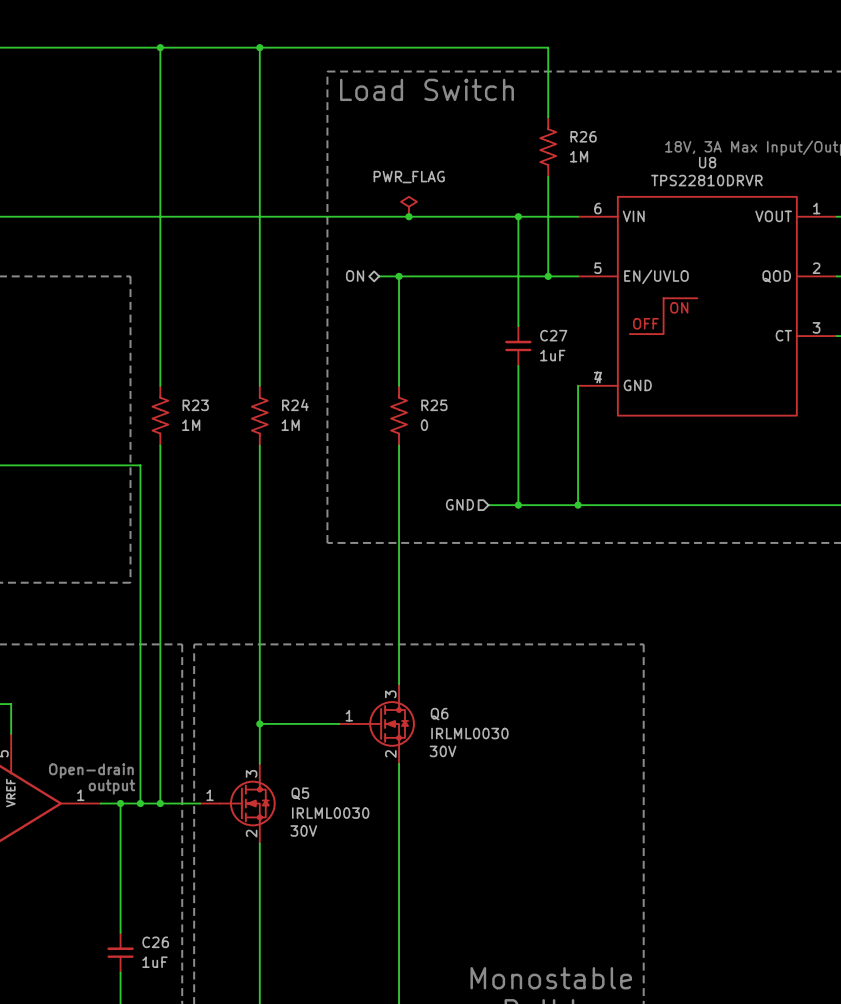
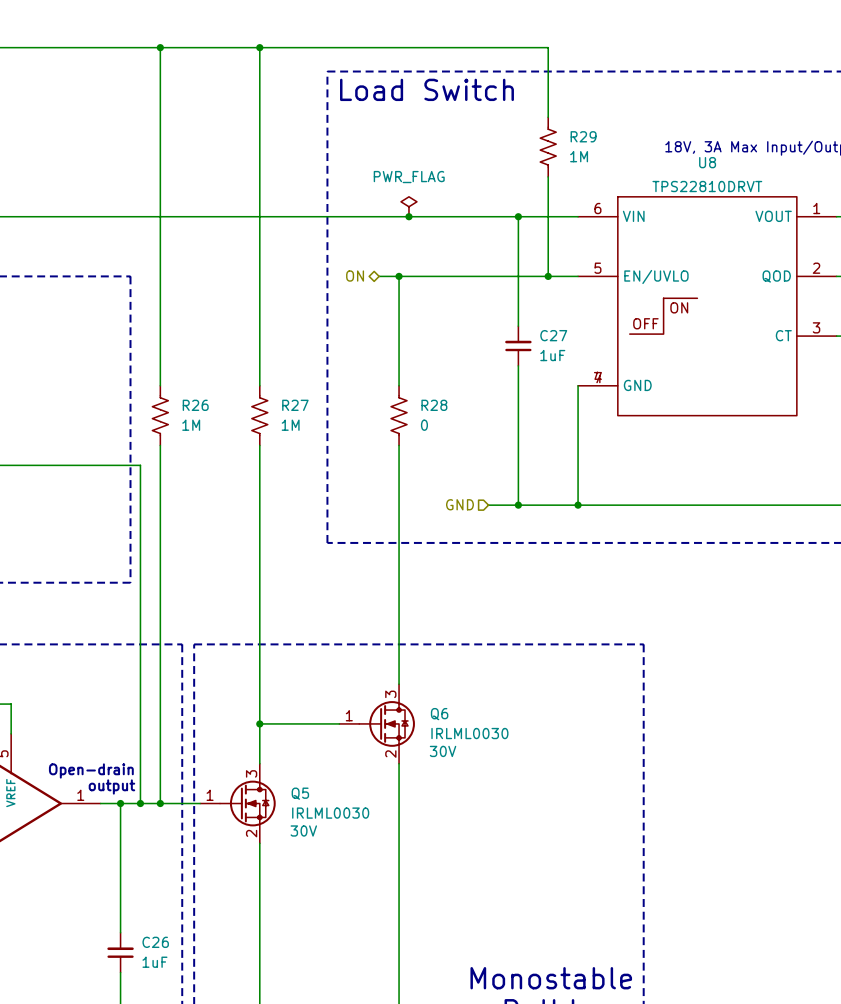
R26 name: R26 (583, 136) -> R29 (583, 136)
U8 value: TPS22810DRVR (706, 180) -> TPS22810DRVT (707, 186)
R23 name: R23 (195, 405) -> R26 (195, 405)
R24 name: R24 (295, 405) -> R27 (295, 405)
R25 name: R25 (434, 405) -> R28 (434, 405)

